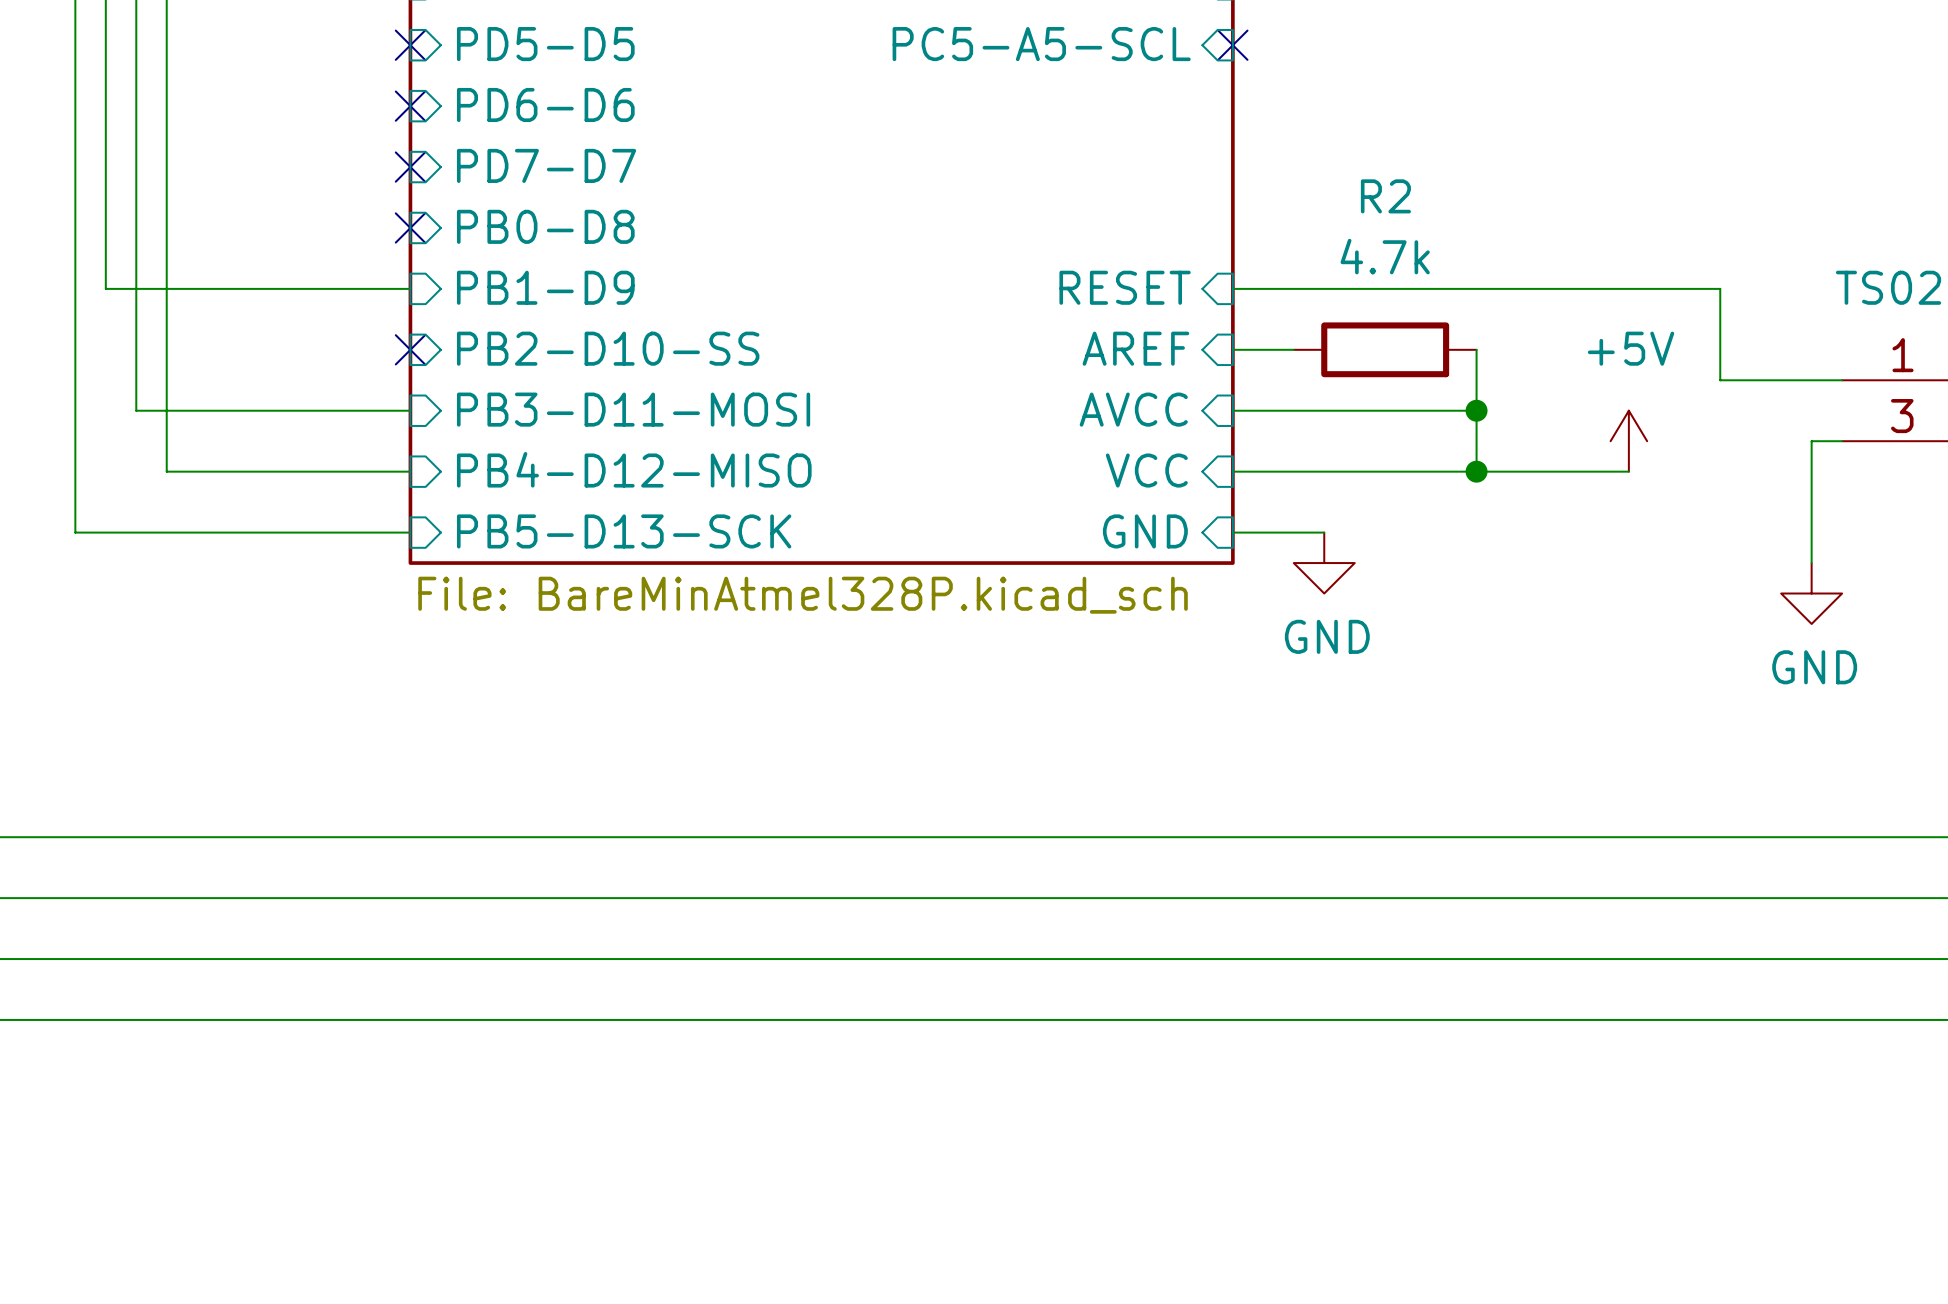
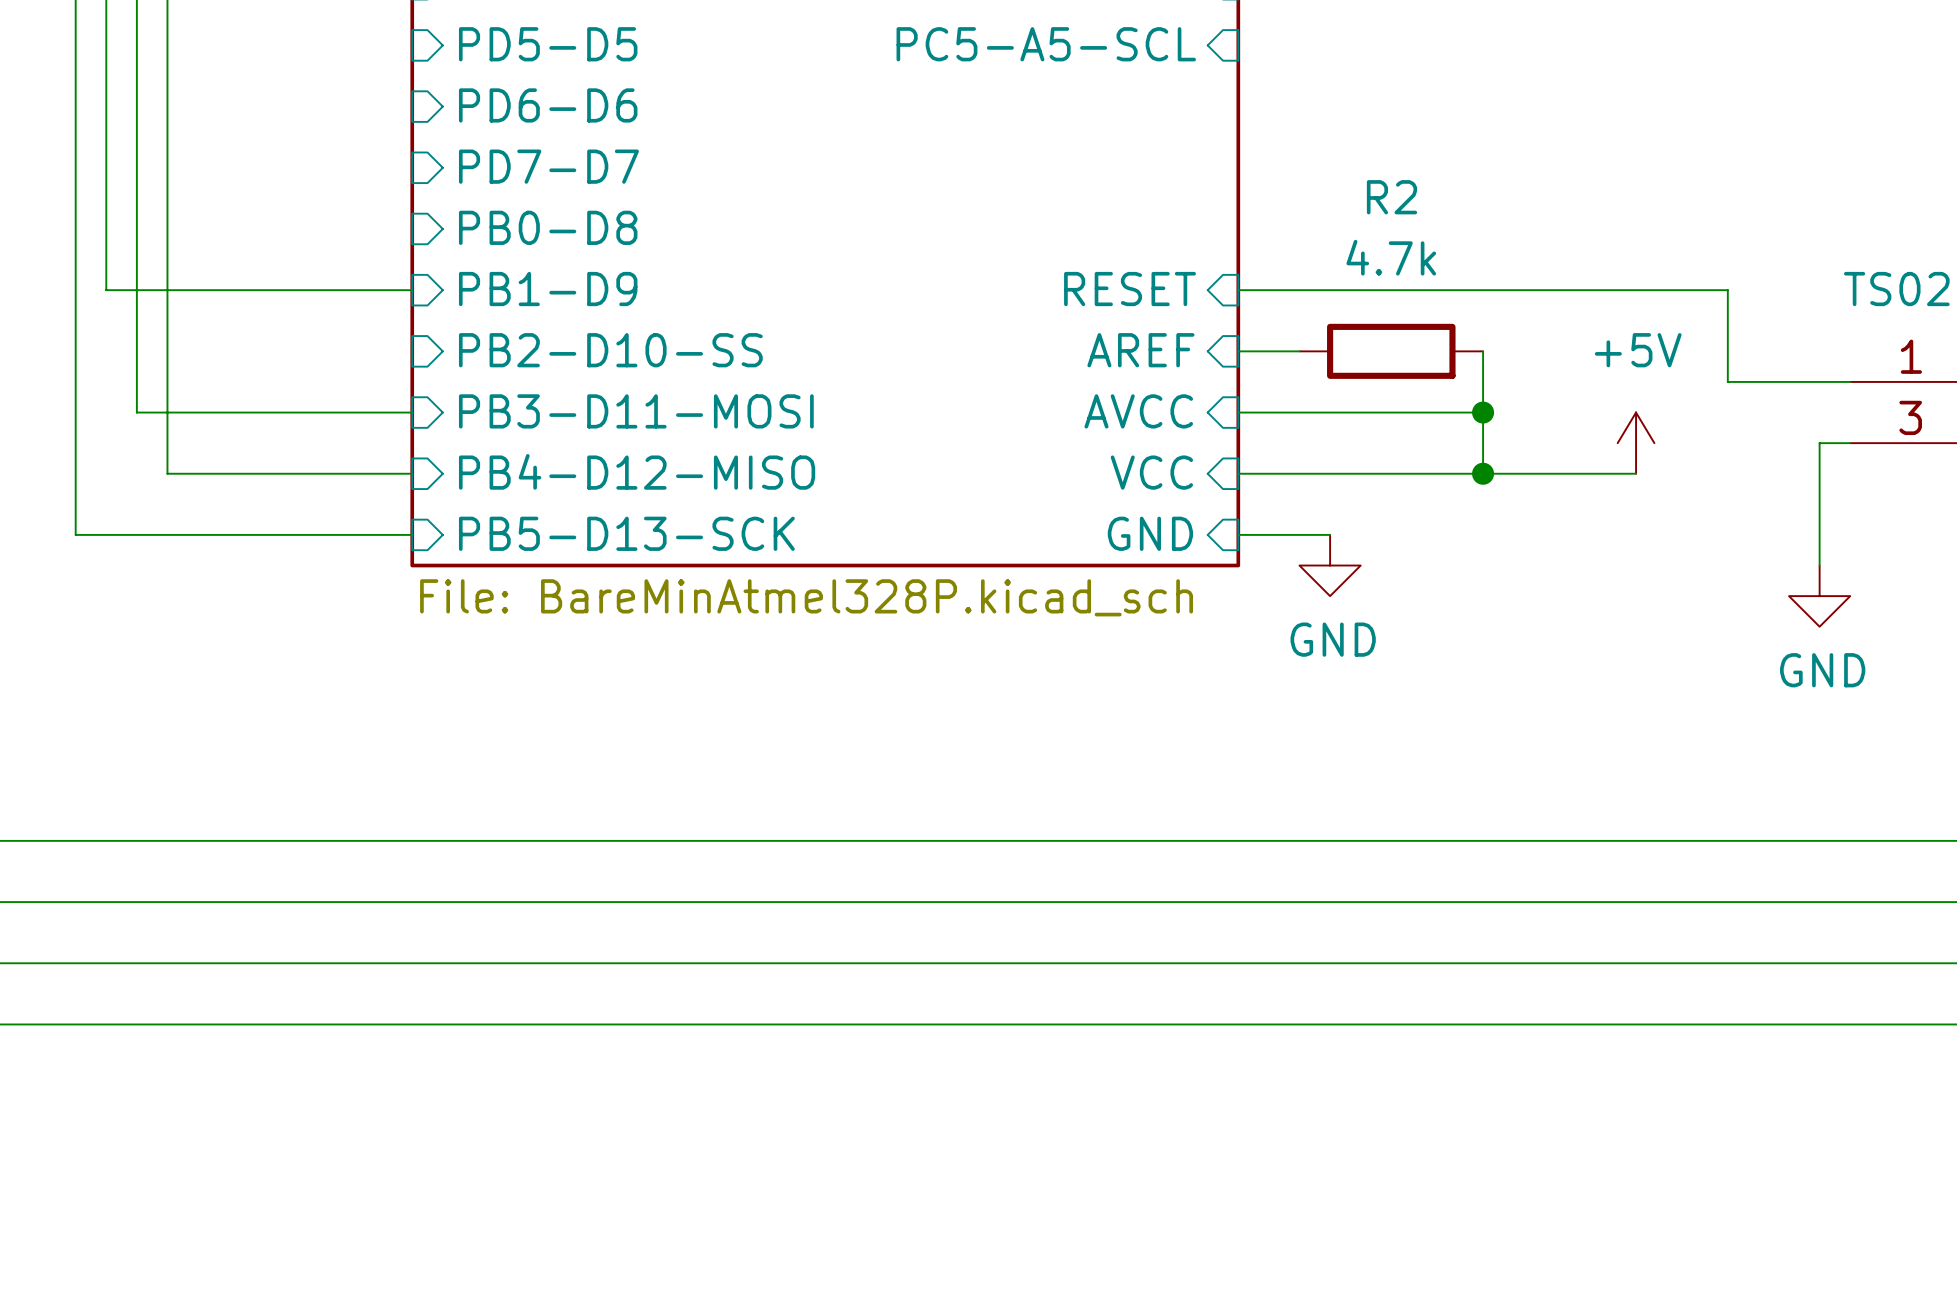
no-connect mark: (410, 45) -> none
no-connect mark: (1232, 45) -> none
no-connect mark: (410, 106) -> none
no-connect mark: (410, 167) -> none
no-connect mark: (410, 227) -> none
no-connect mark: (410, 349) -> none

